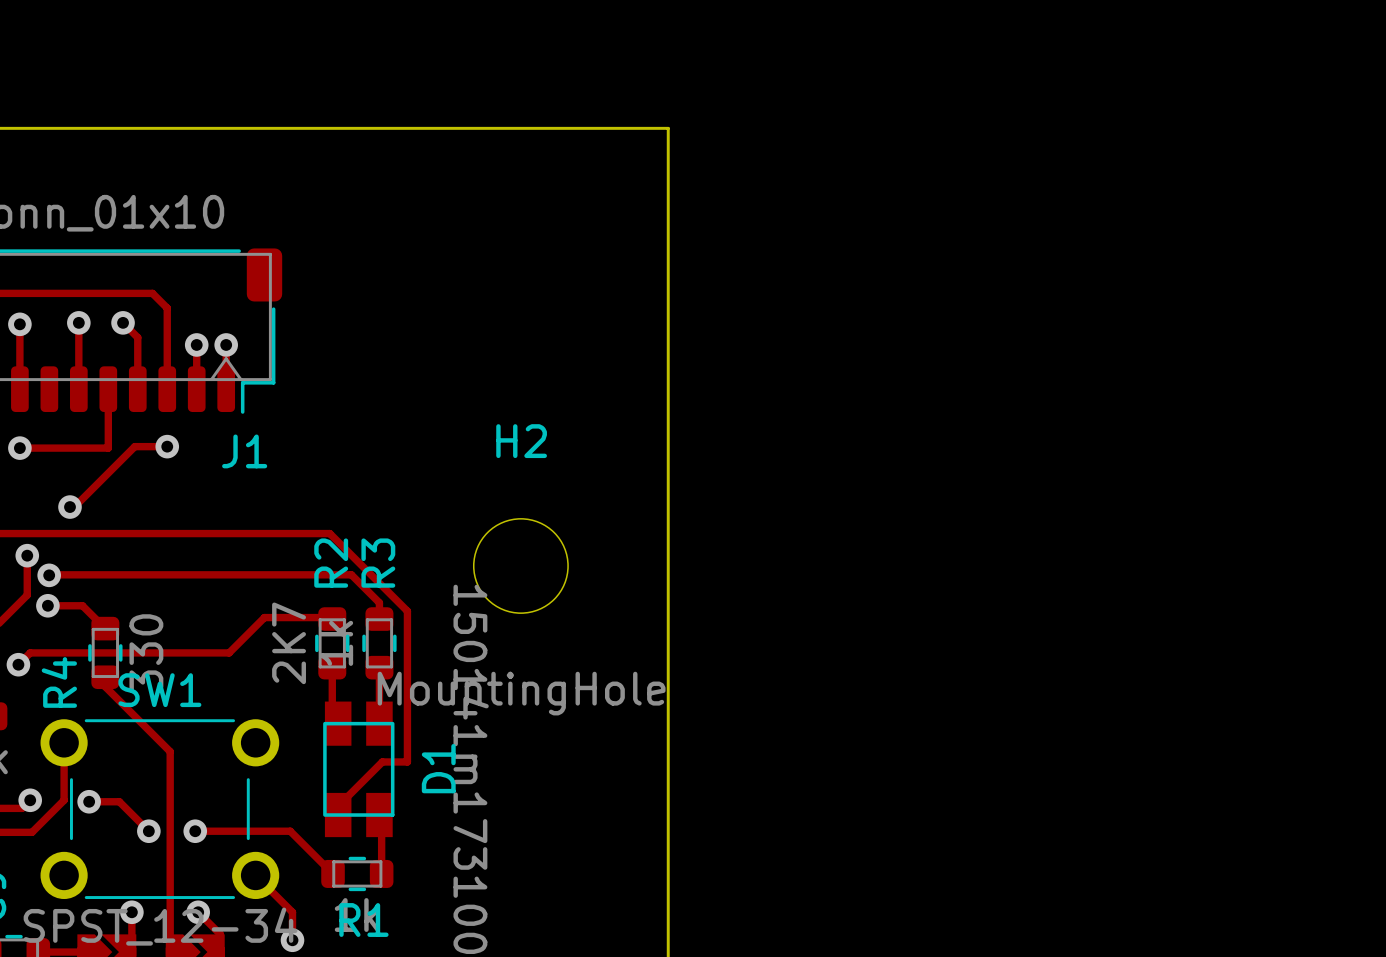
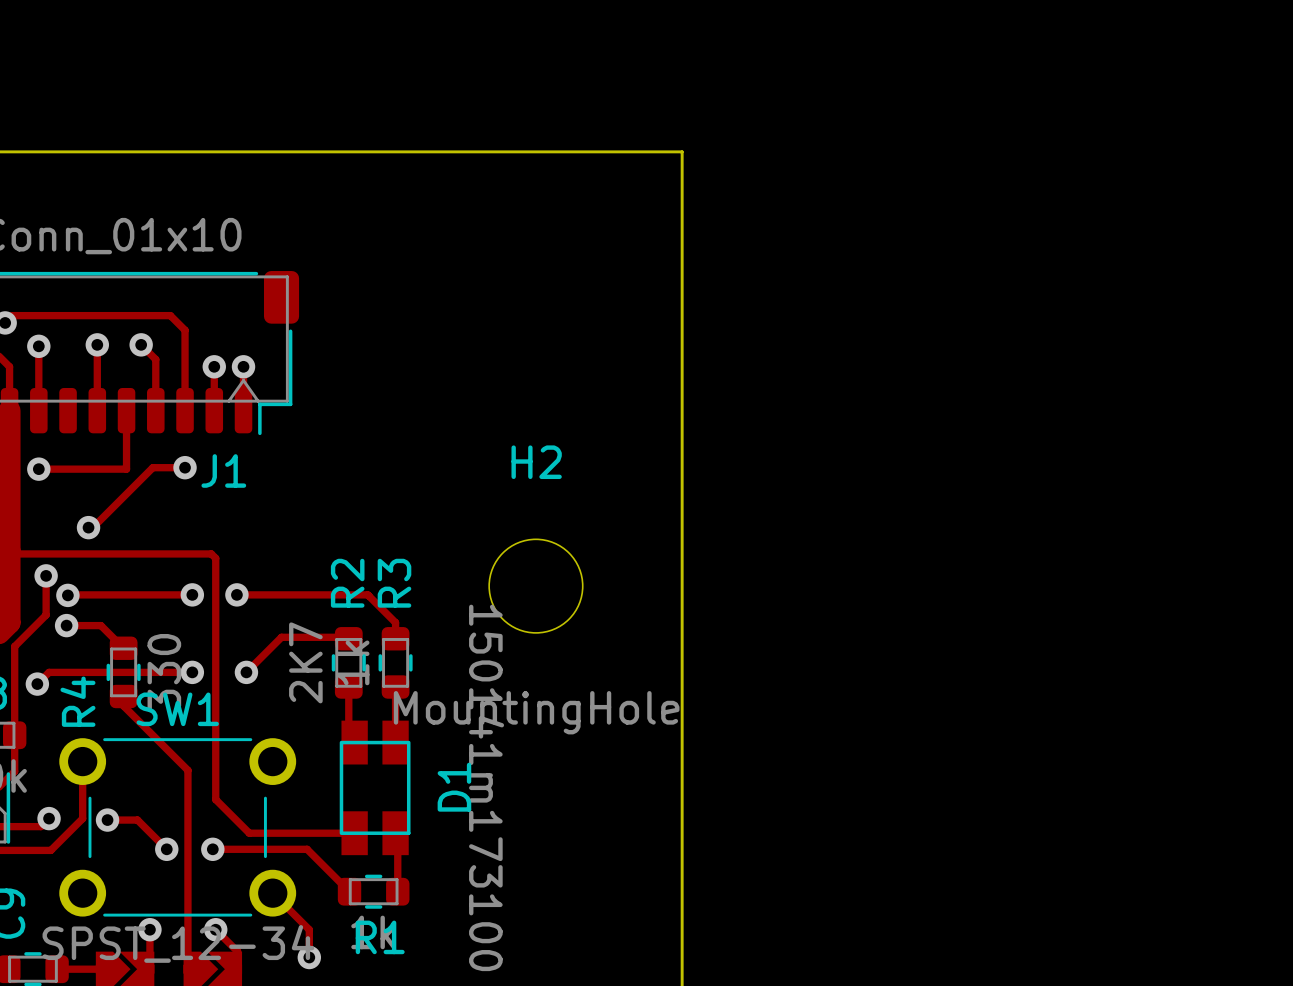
J1 name position: J1 (244, 451) -> J1 (223, 470)
track: (193, 533) (329, 533) (407, 611) (407, 761) (382, 761) (338, 806) (338, 815) -> (211, 553) (215, 558) (215, 799) (249, 833) (354, 833)
track: (174, 574) (219, 574) -> none
via: none -> (192, 594)
via: none -> (236, 594)
track: (174, 652) (229, 652) -> none
via: none -> (192, 672)
via: none -> (246, 672)

